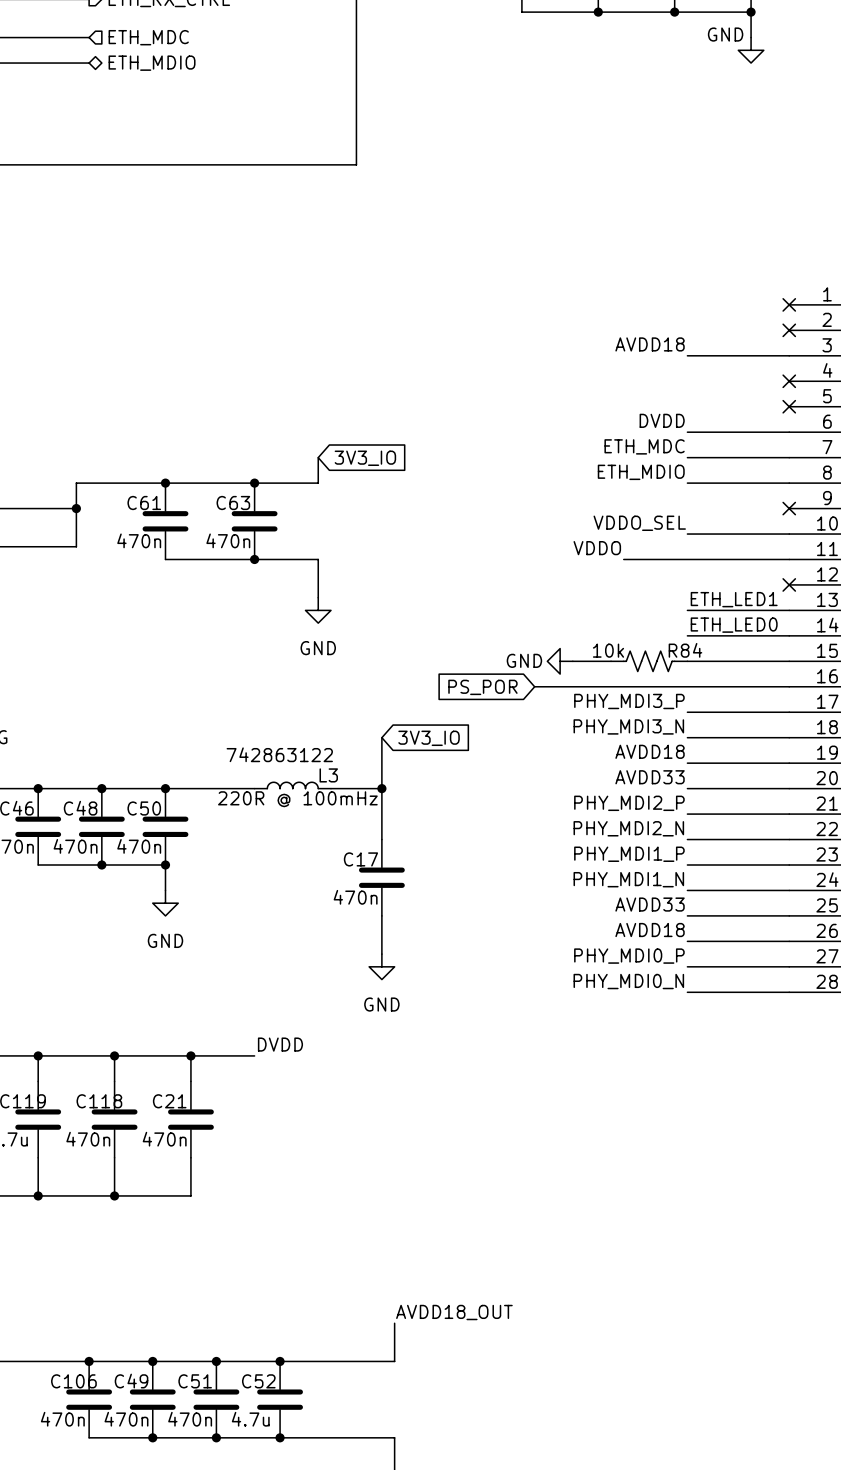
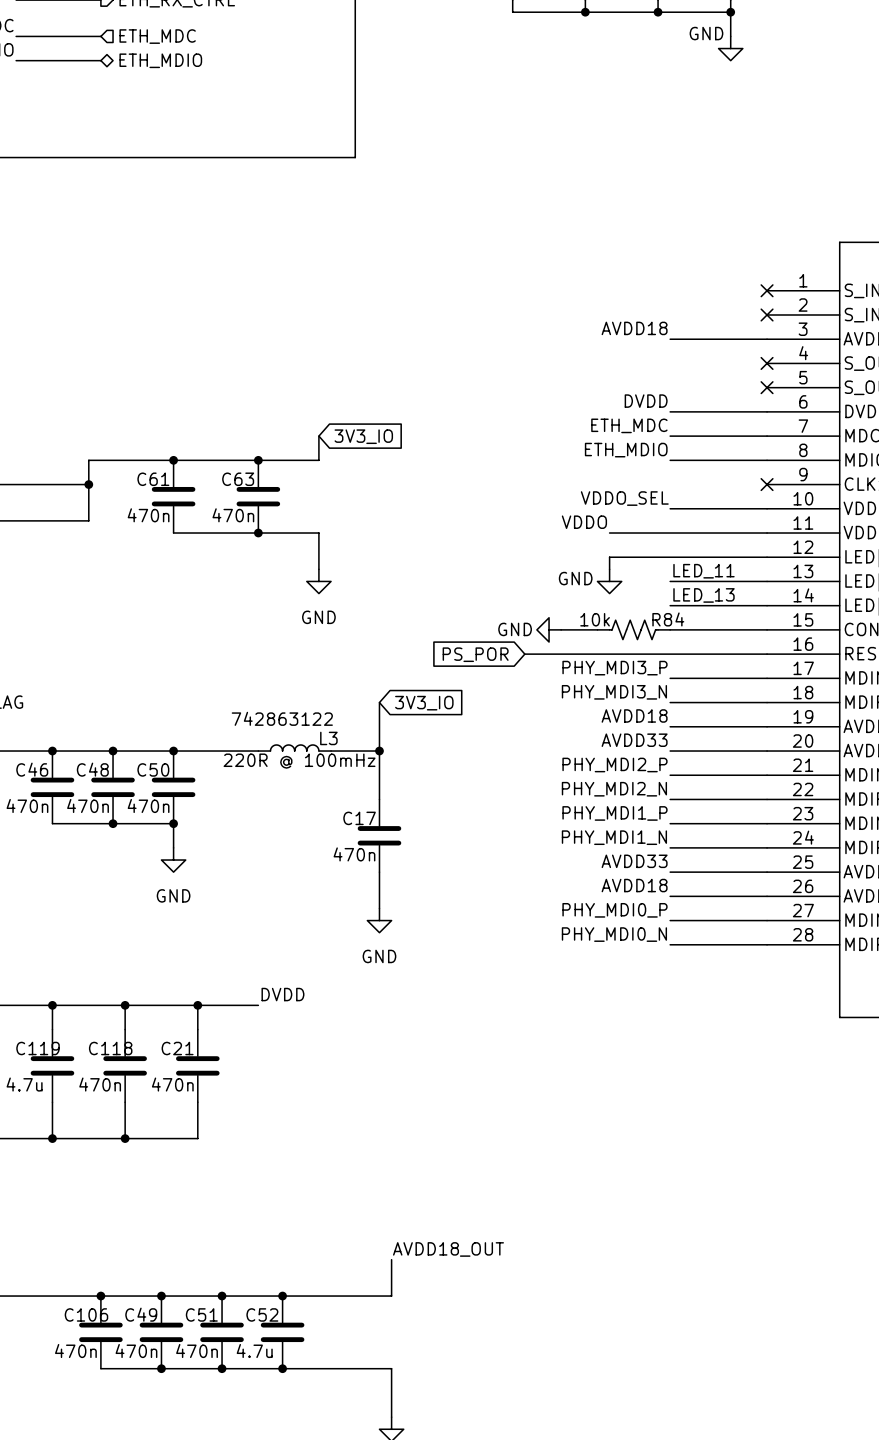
wire: none -> (767, 557) (609, 557) (609, 569)
no-connect mark: (789, 584) -> none
label: ETH_LED1 (734, 599) -> LED_11 (703, 571)
power symbol: none -> GND (609, 581)
label: ETH_LED0 (734, 625) -> LED_13 (703, 595)

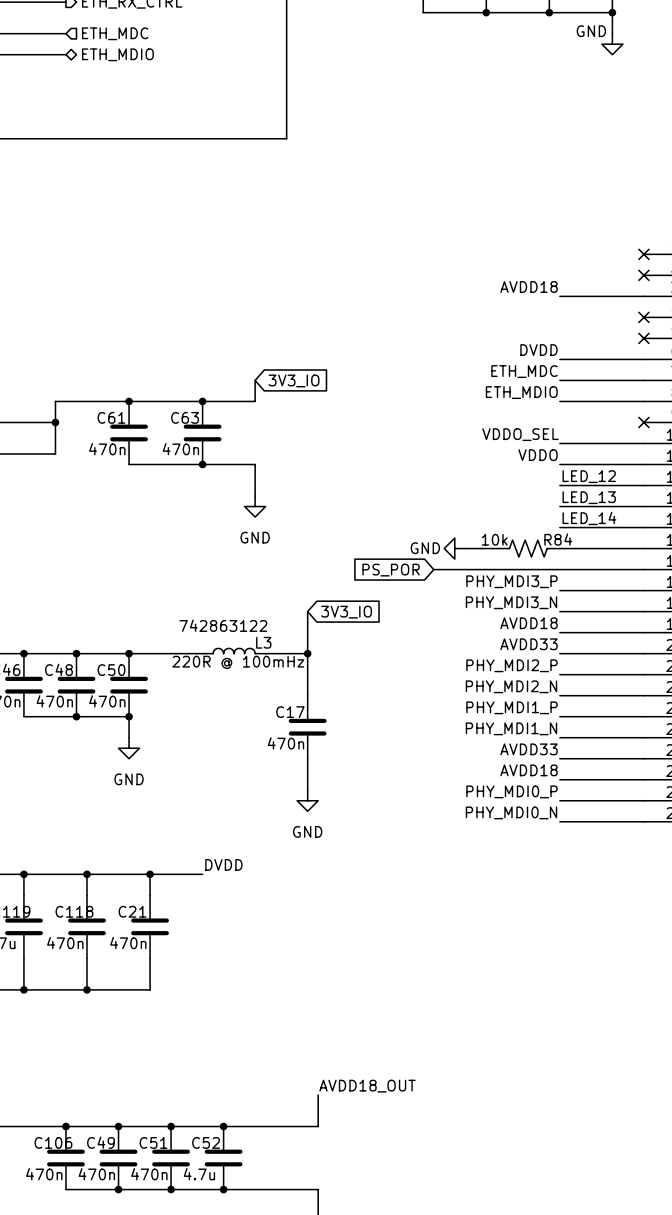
label position: VDDO (584, 522) -> VDDO (538, 455)
wire: (609, 533) (670, 533) -> none
label: none -> LED_12 (589, 476)
wire: (670, 557) (609, 557) (609, 569) -> none
label: LED_11 (703, 571) -> LED_13 (589, 497)
power symbol: GND (609, 581) -> none
label: LED_13 (703, 595) -> LED_14 (589, 518)

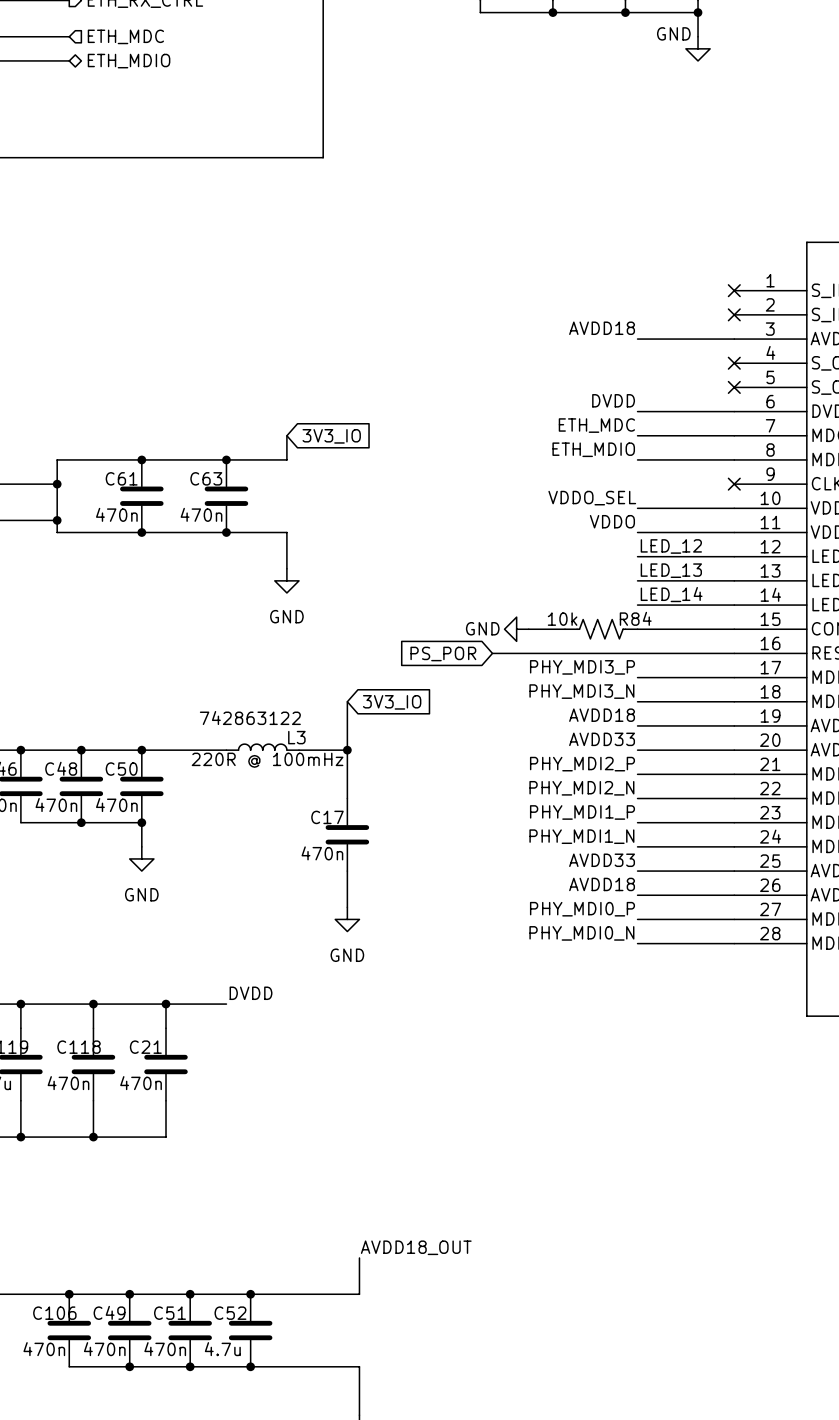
wire: none -> (57, 520) (57, 532) (141, 532)
junction: none -> (57, 520)
junction: none -> (141, 532)

